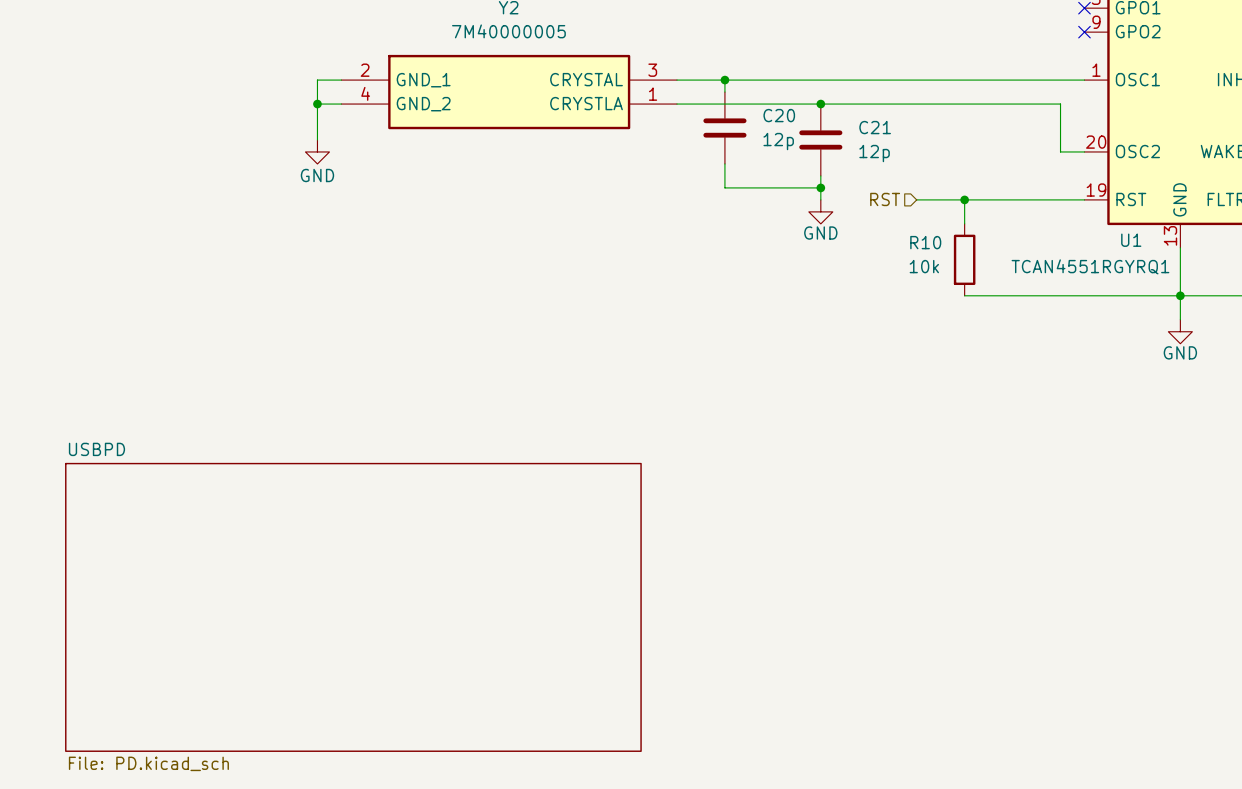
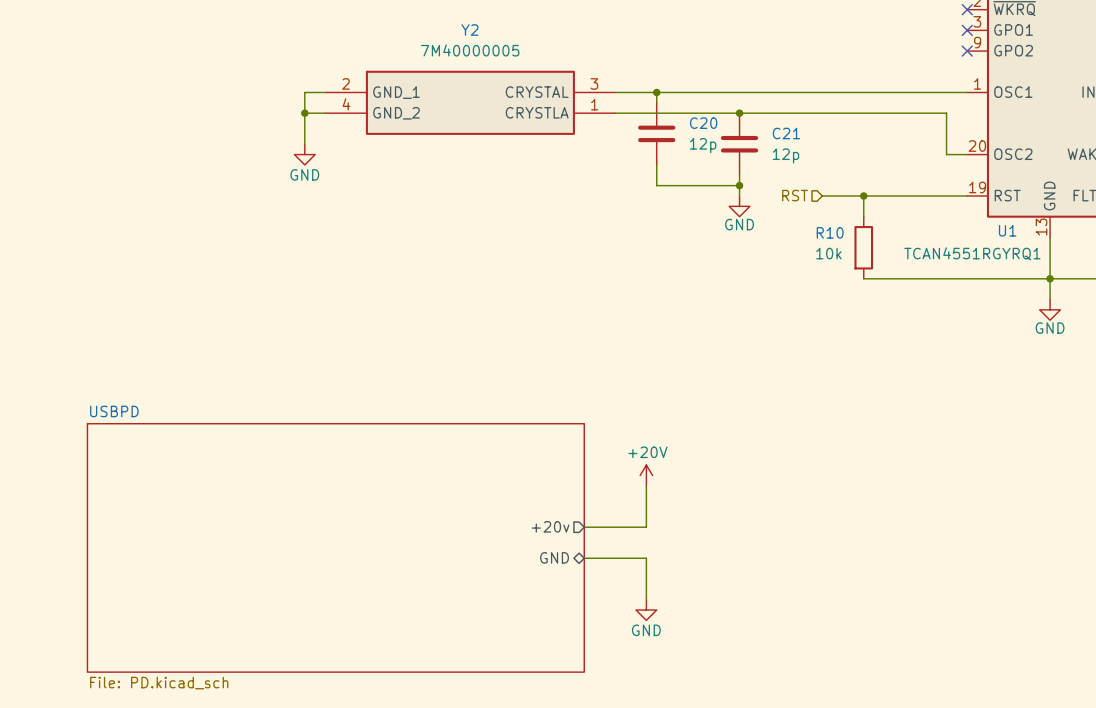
power symbol: none -> +20V (646, 475)
wire: none -> (646, 485) (646, 527) (584, 527)
sheet pin: none -> +20v (550, 526)
sheet pin: none -> GND (554, 557)
wire: none -> (584, 558) (646, 558) (646, 599)
power symbol: none -> GND (646, 610)

